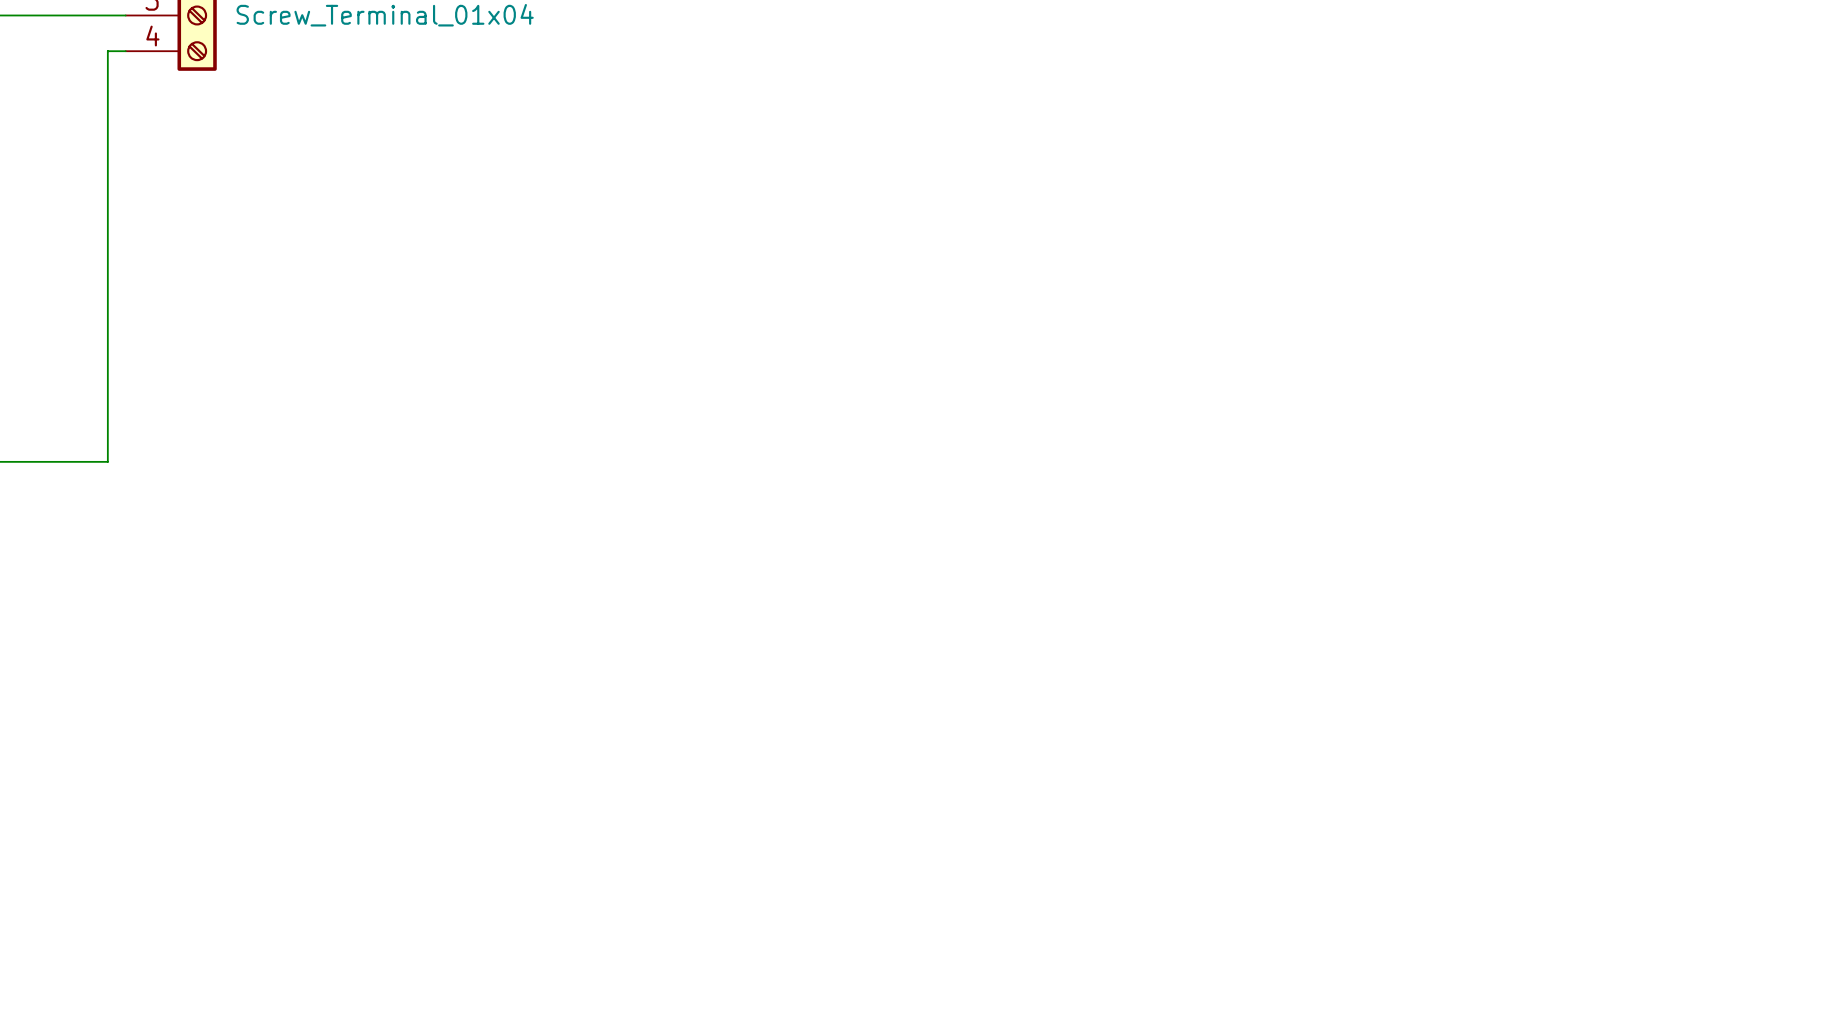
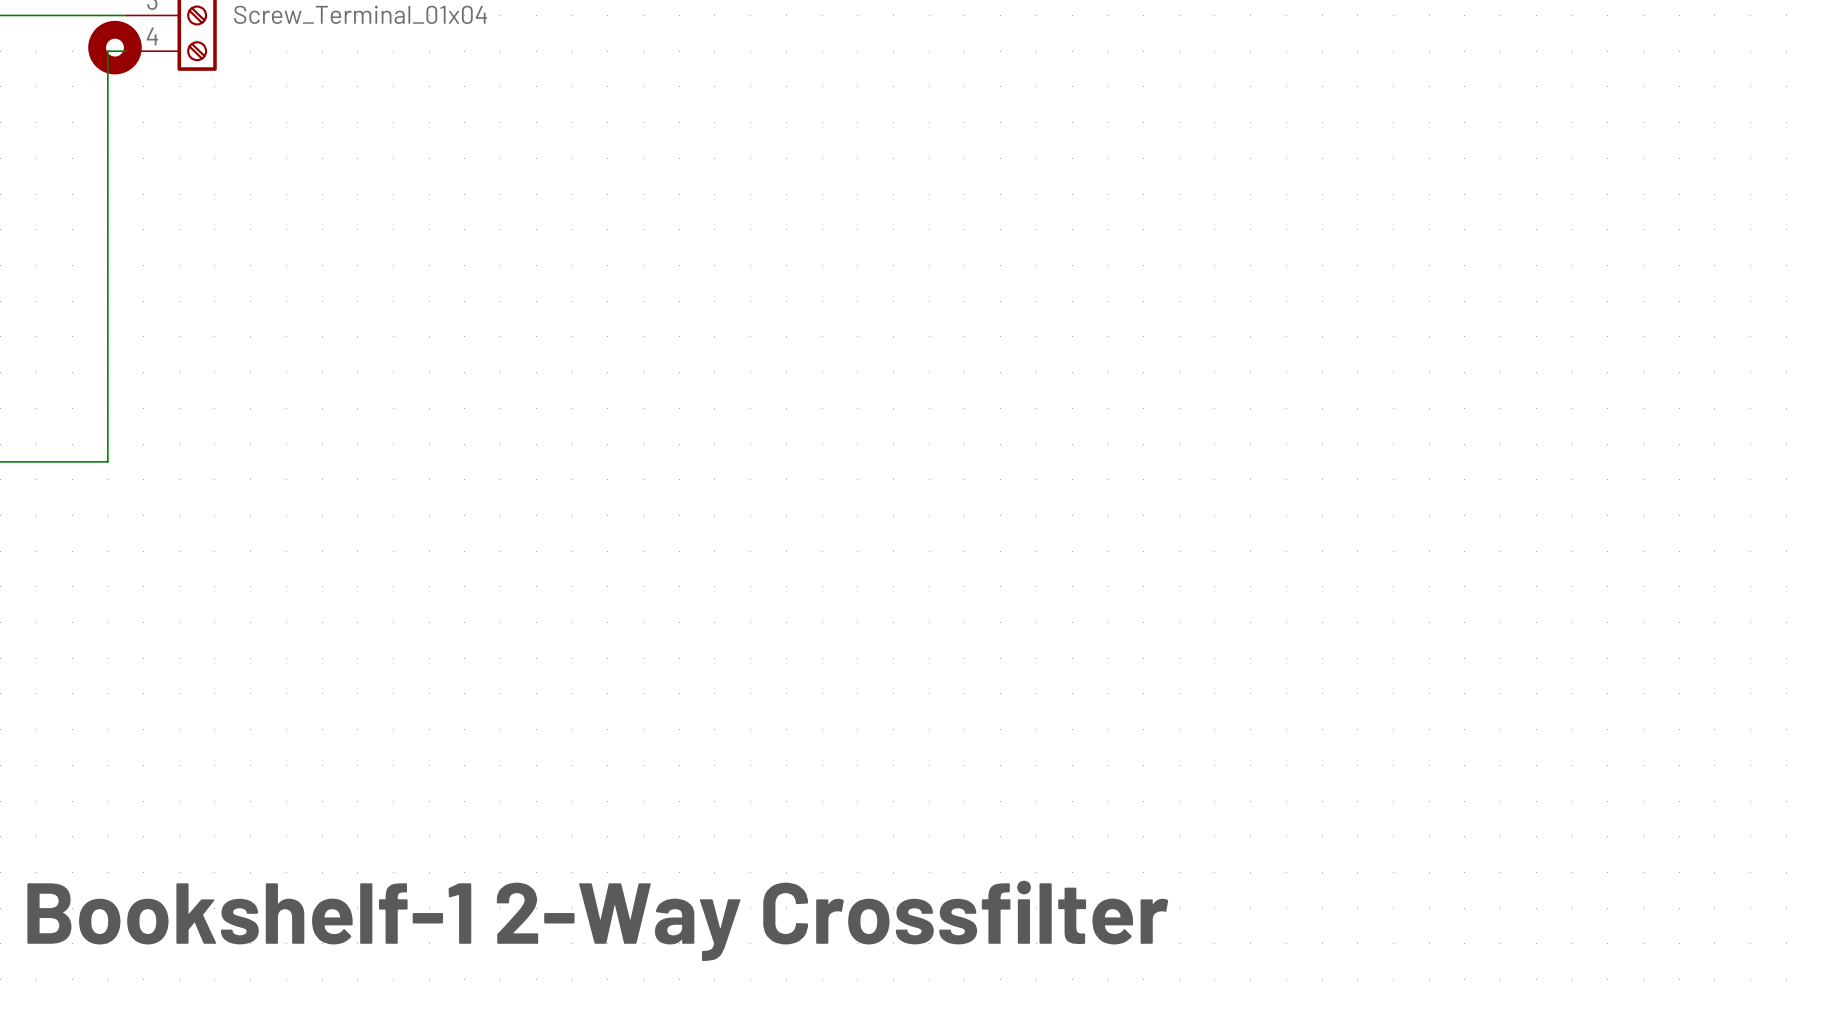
part: none -> (114, 47)
text: none -> Bookshelf-1 2-Way Crossfilter (597, 920)

